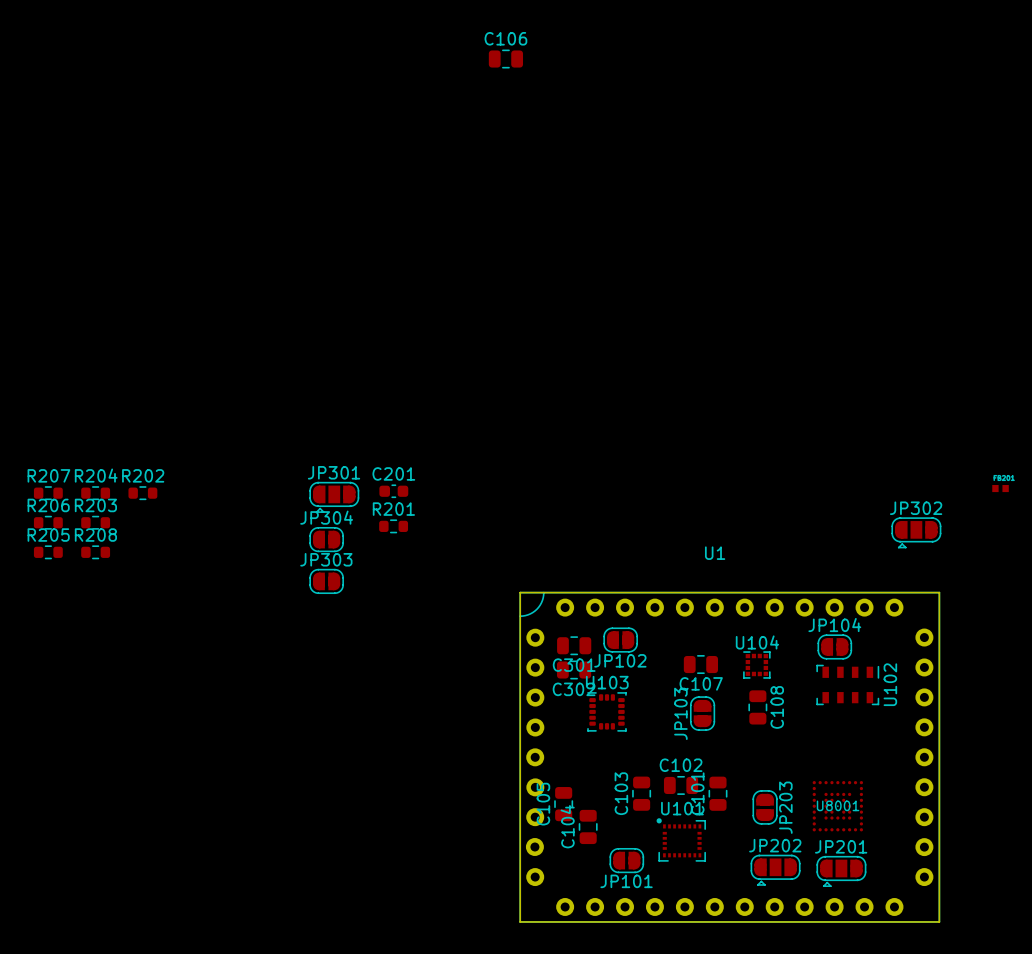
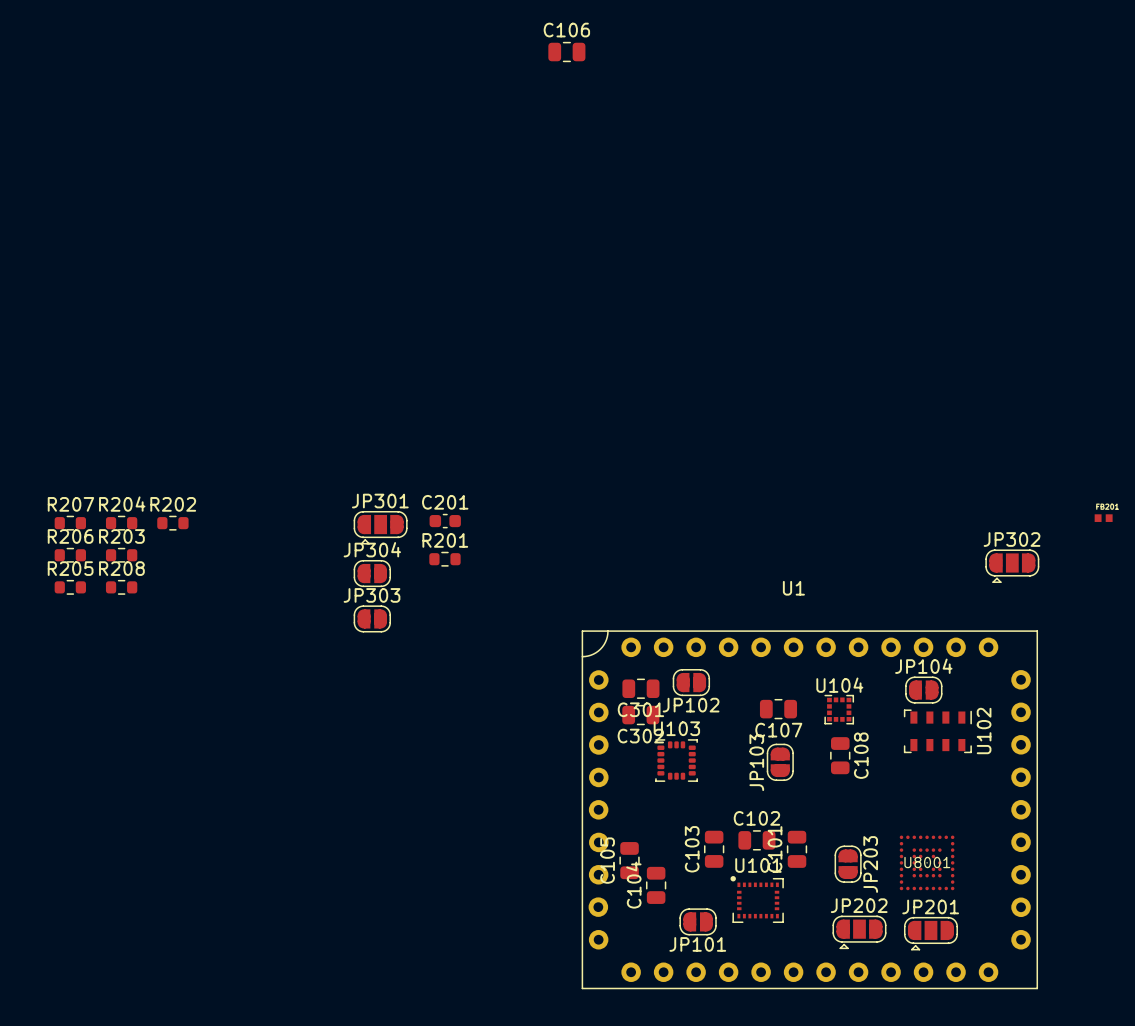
board edge: (520, 592) (939, 592) (939, 921) (520, 921) (520, 592) -> none

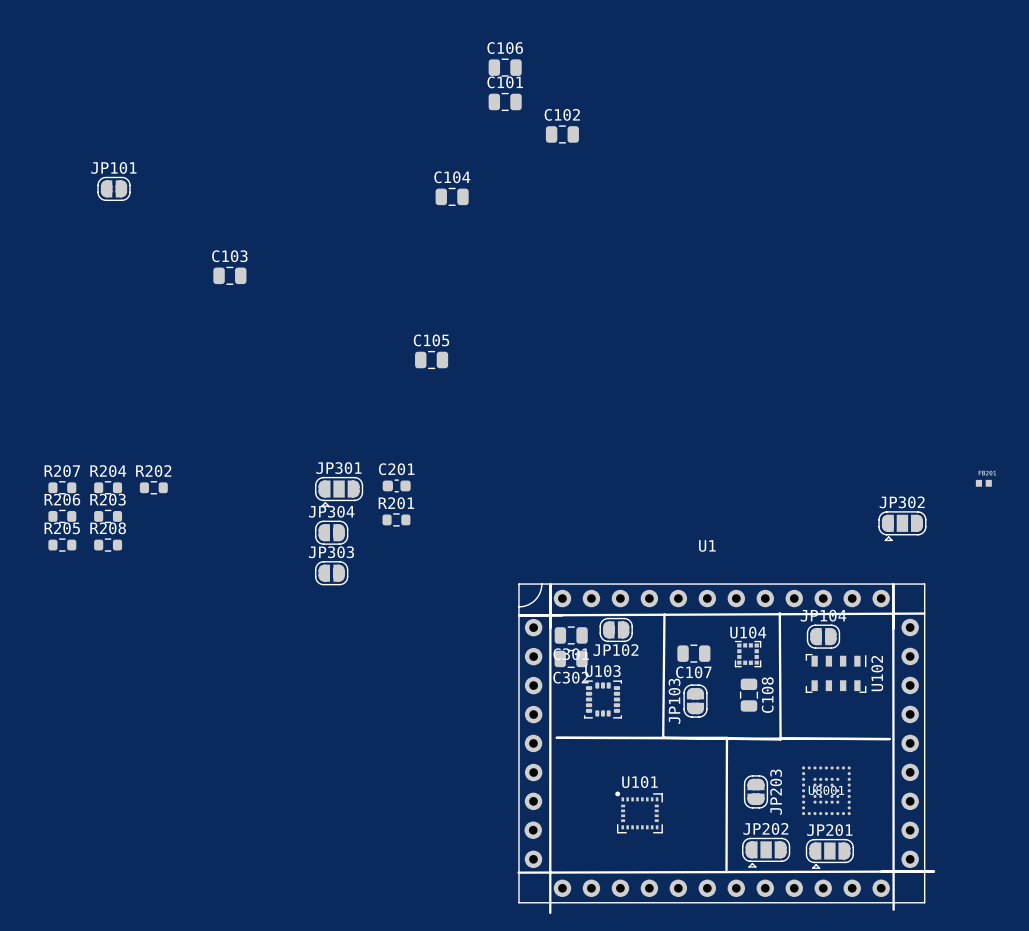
line: none -> (779, 613) (780, 739) (663, 737) (664, 614)
line: none -> (924, 613) (519, 615) (562, 615)
line: none -> (550, 627) (550, 584) (550, 912)
line: none -> (893, 628) (893, 584) (893, 909)
line: none -> (781, 738) (889, 739) (556, 737) (726, 737) (726, 870)
C102 position: (756, 840) -> (562, 134)
C103 rotation: 0° (714, 849) -> 90° clockwise (229, 275)
C103 position: (714, 849) -> (229, 275)
C101 rotation: 0° (797, 849) -> 90° clockwise (505, 101)
C101 position: (797, 849) -> (505, 101)
C105 rotation: 0° (629, 860) -> 90° clockwise (431, 359)
C105 position: (629, 860) -> (431, 359)
C104 rotation: 0° (656, 885) -> 90° clockwise (452, 196)
C104 position: (656, 885) -> (452, 196)
U101 position: (757, 899) -> (639, 812)
JP101 position: (698, 921) -> (114, 188)
JP101 name position: JP101 (697, 944) -> JP101 (113, 167)
line: none -> (881, 871) (933, 871) (518, 872)

